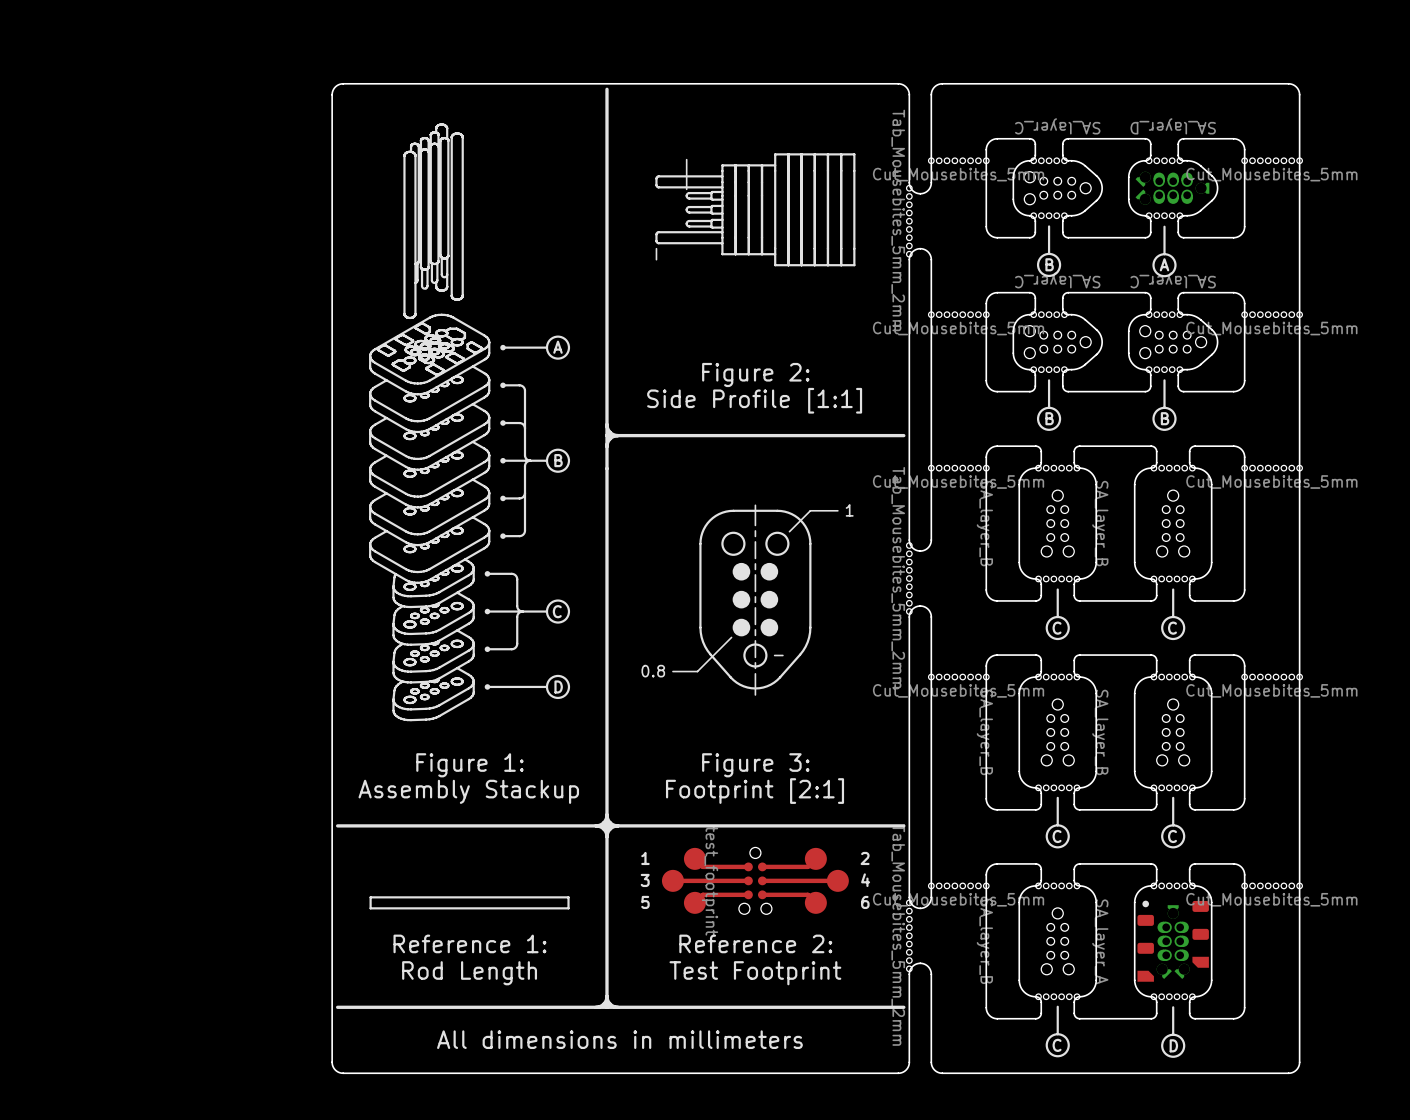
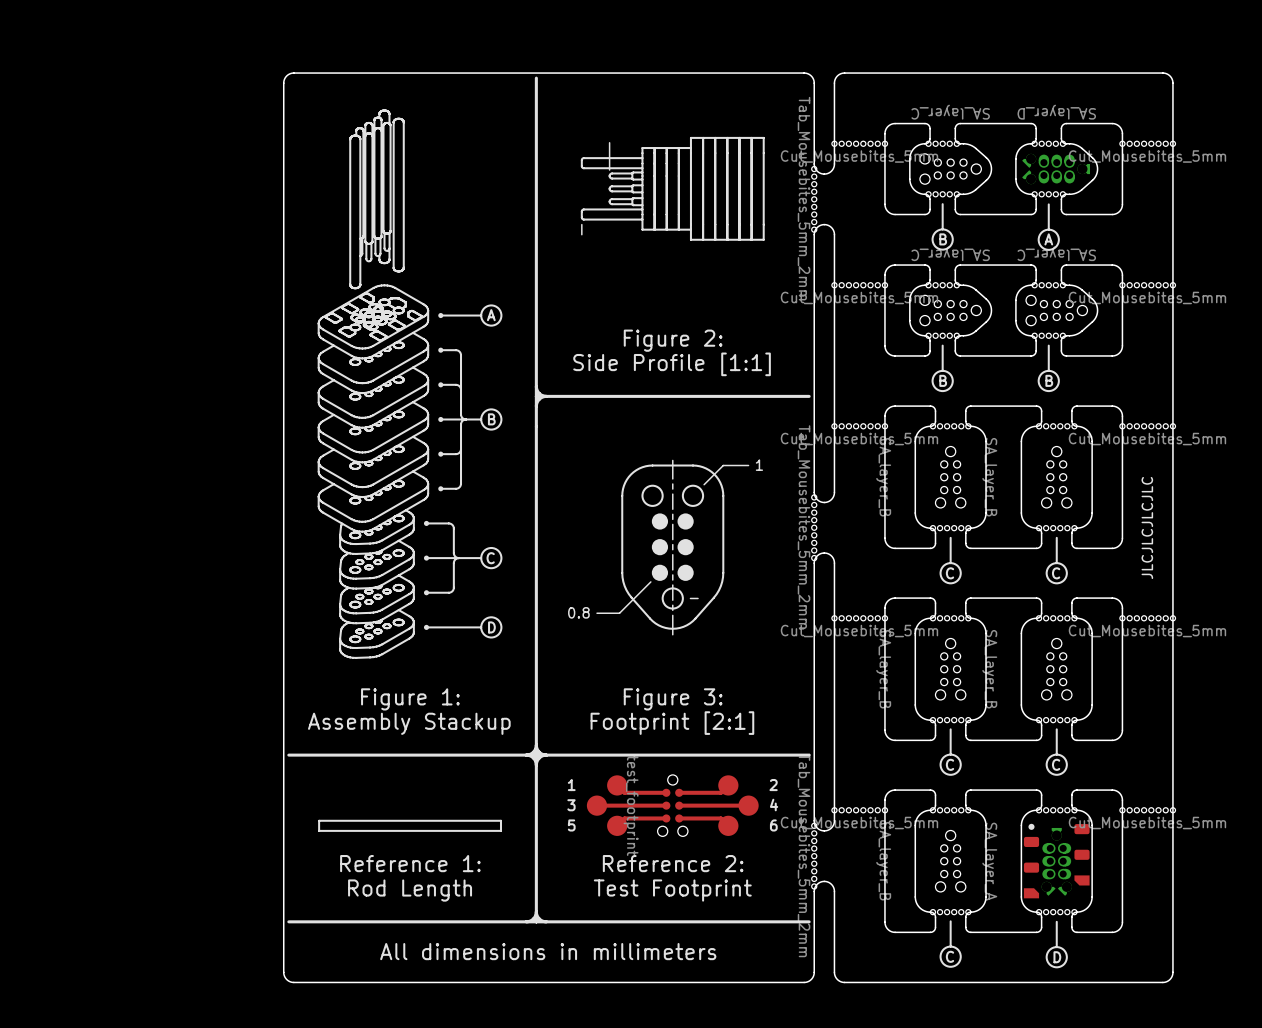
text: none -> JLCJLCJLCJLC (1147, 527)

